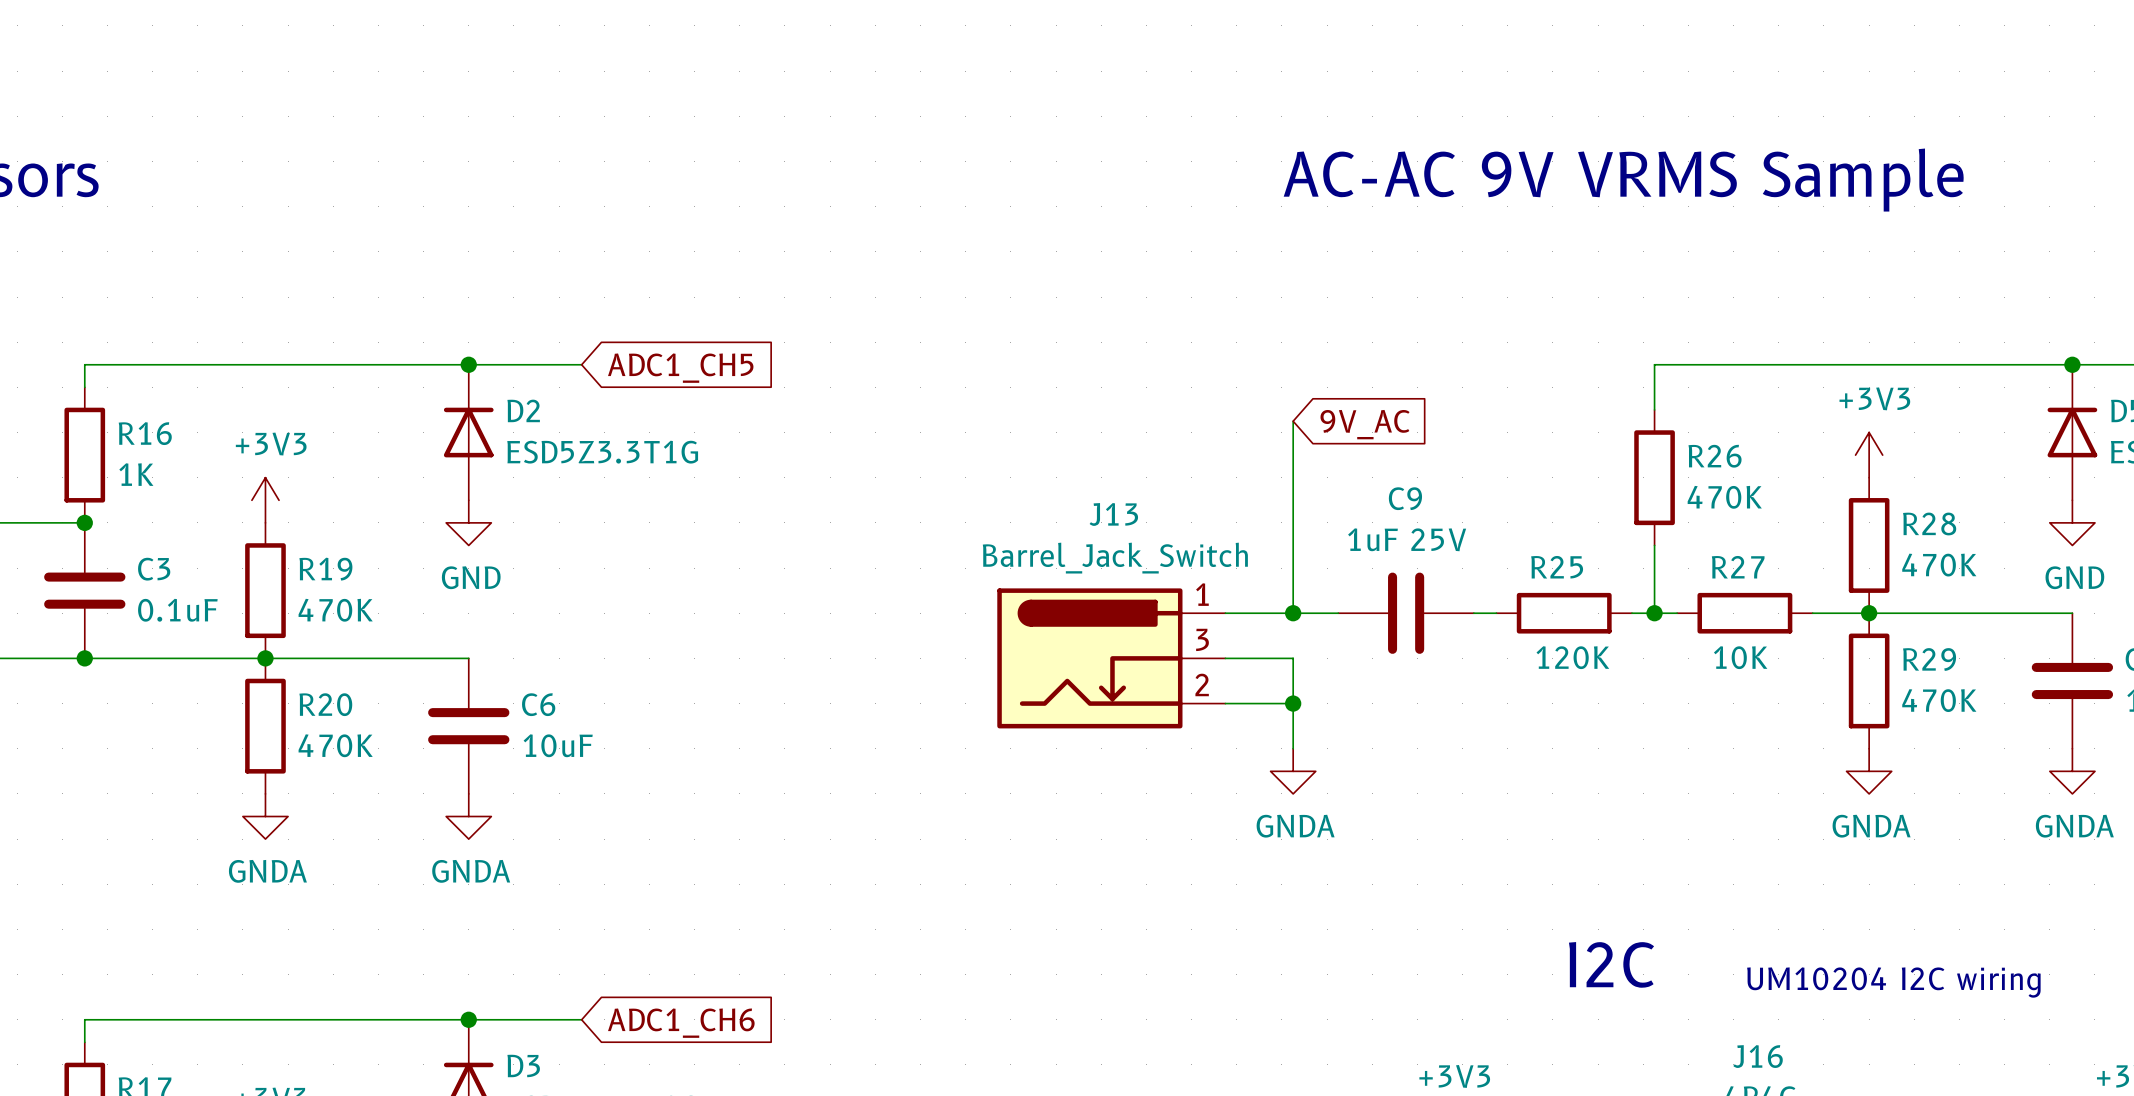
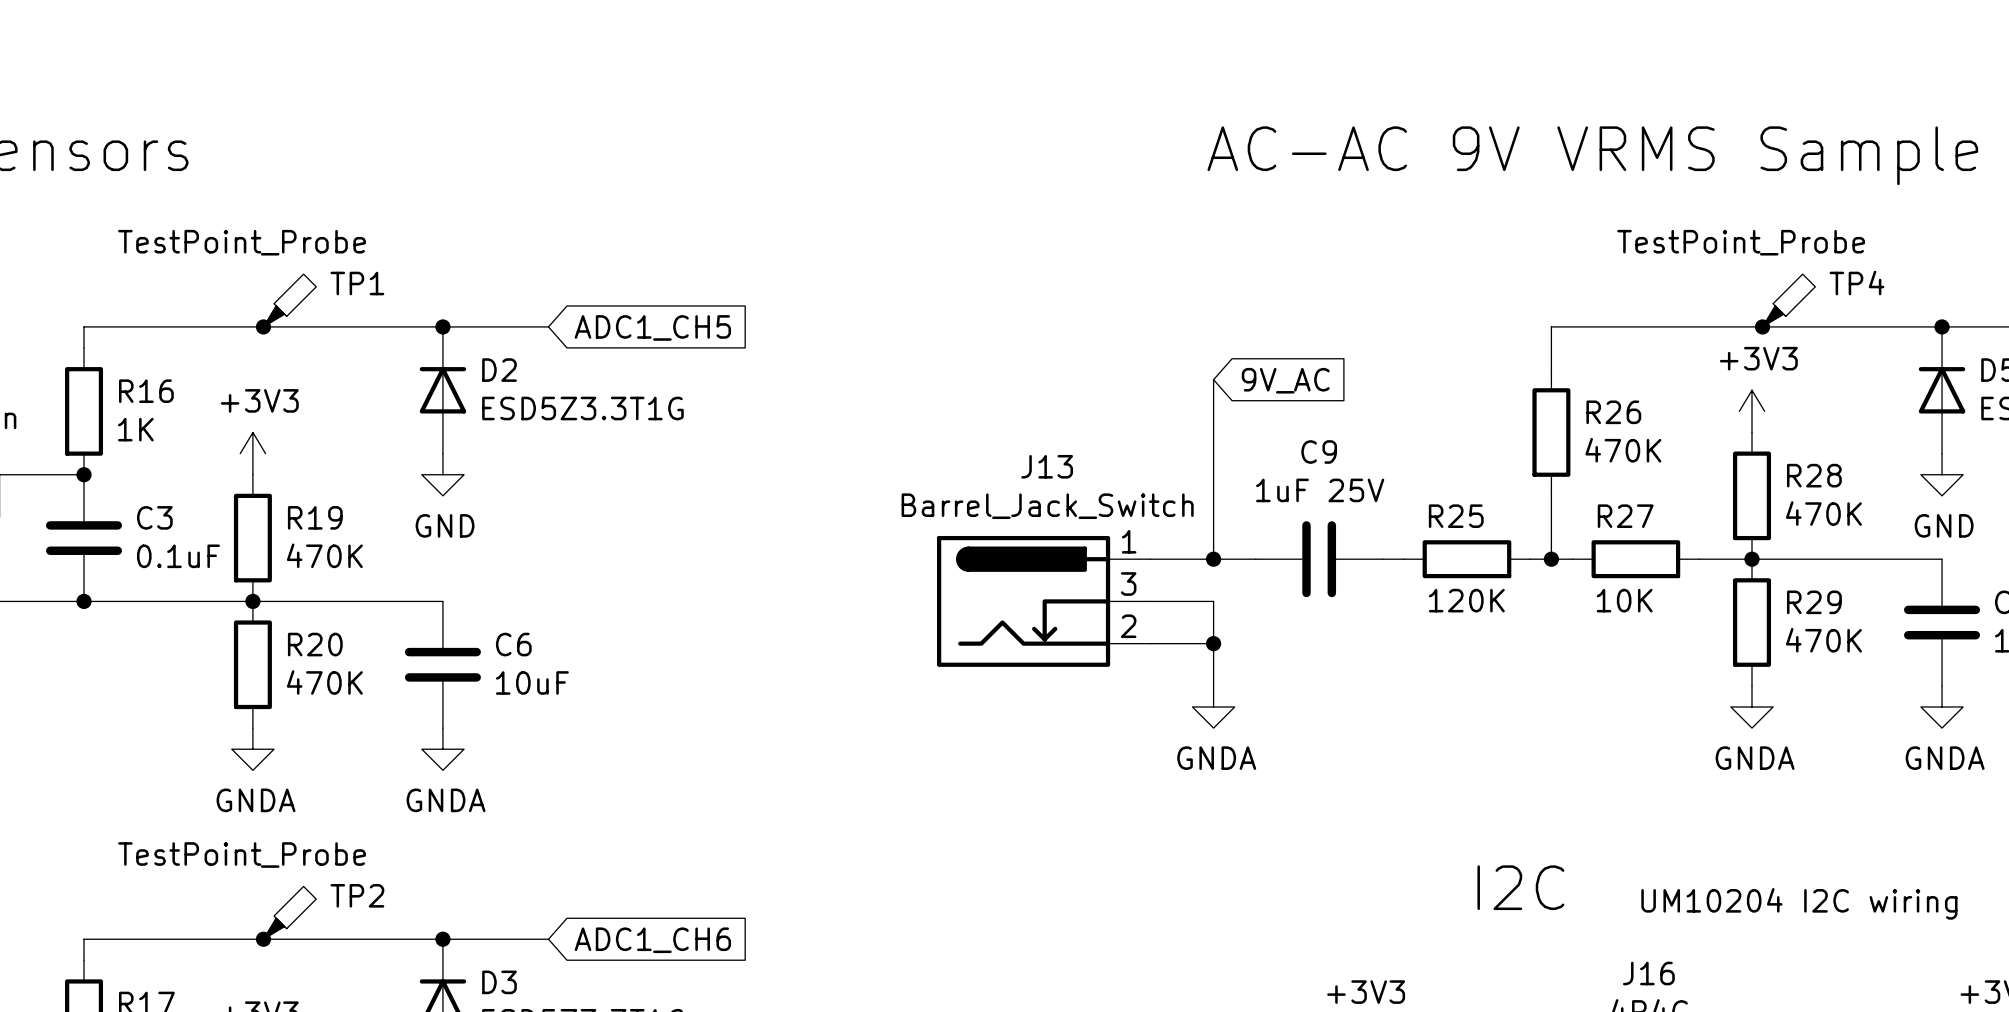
TP1: none -> TestPoint_Probe (289, 300)
TP4: none -> TestPoint_Probe (1788, 300)
junction: none -> (263, 326)
junction: none -> (1762, 326)
TP2: none -> TestPoint_Probe (289, 912)
junction: none -> (263, 939)

